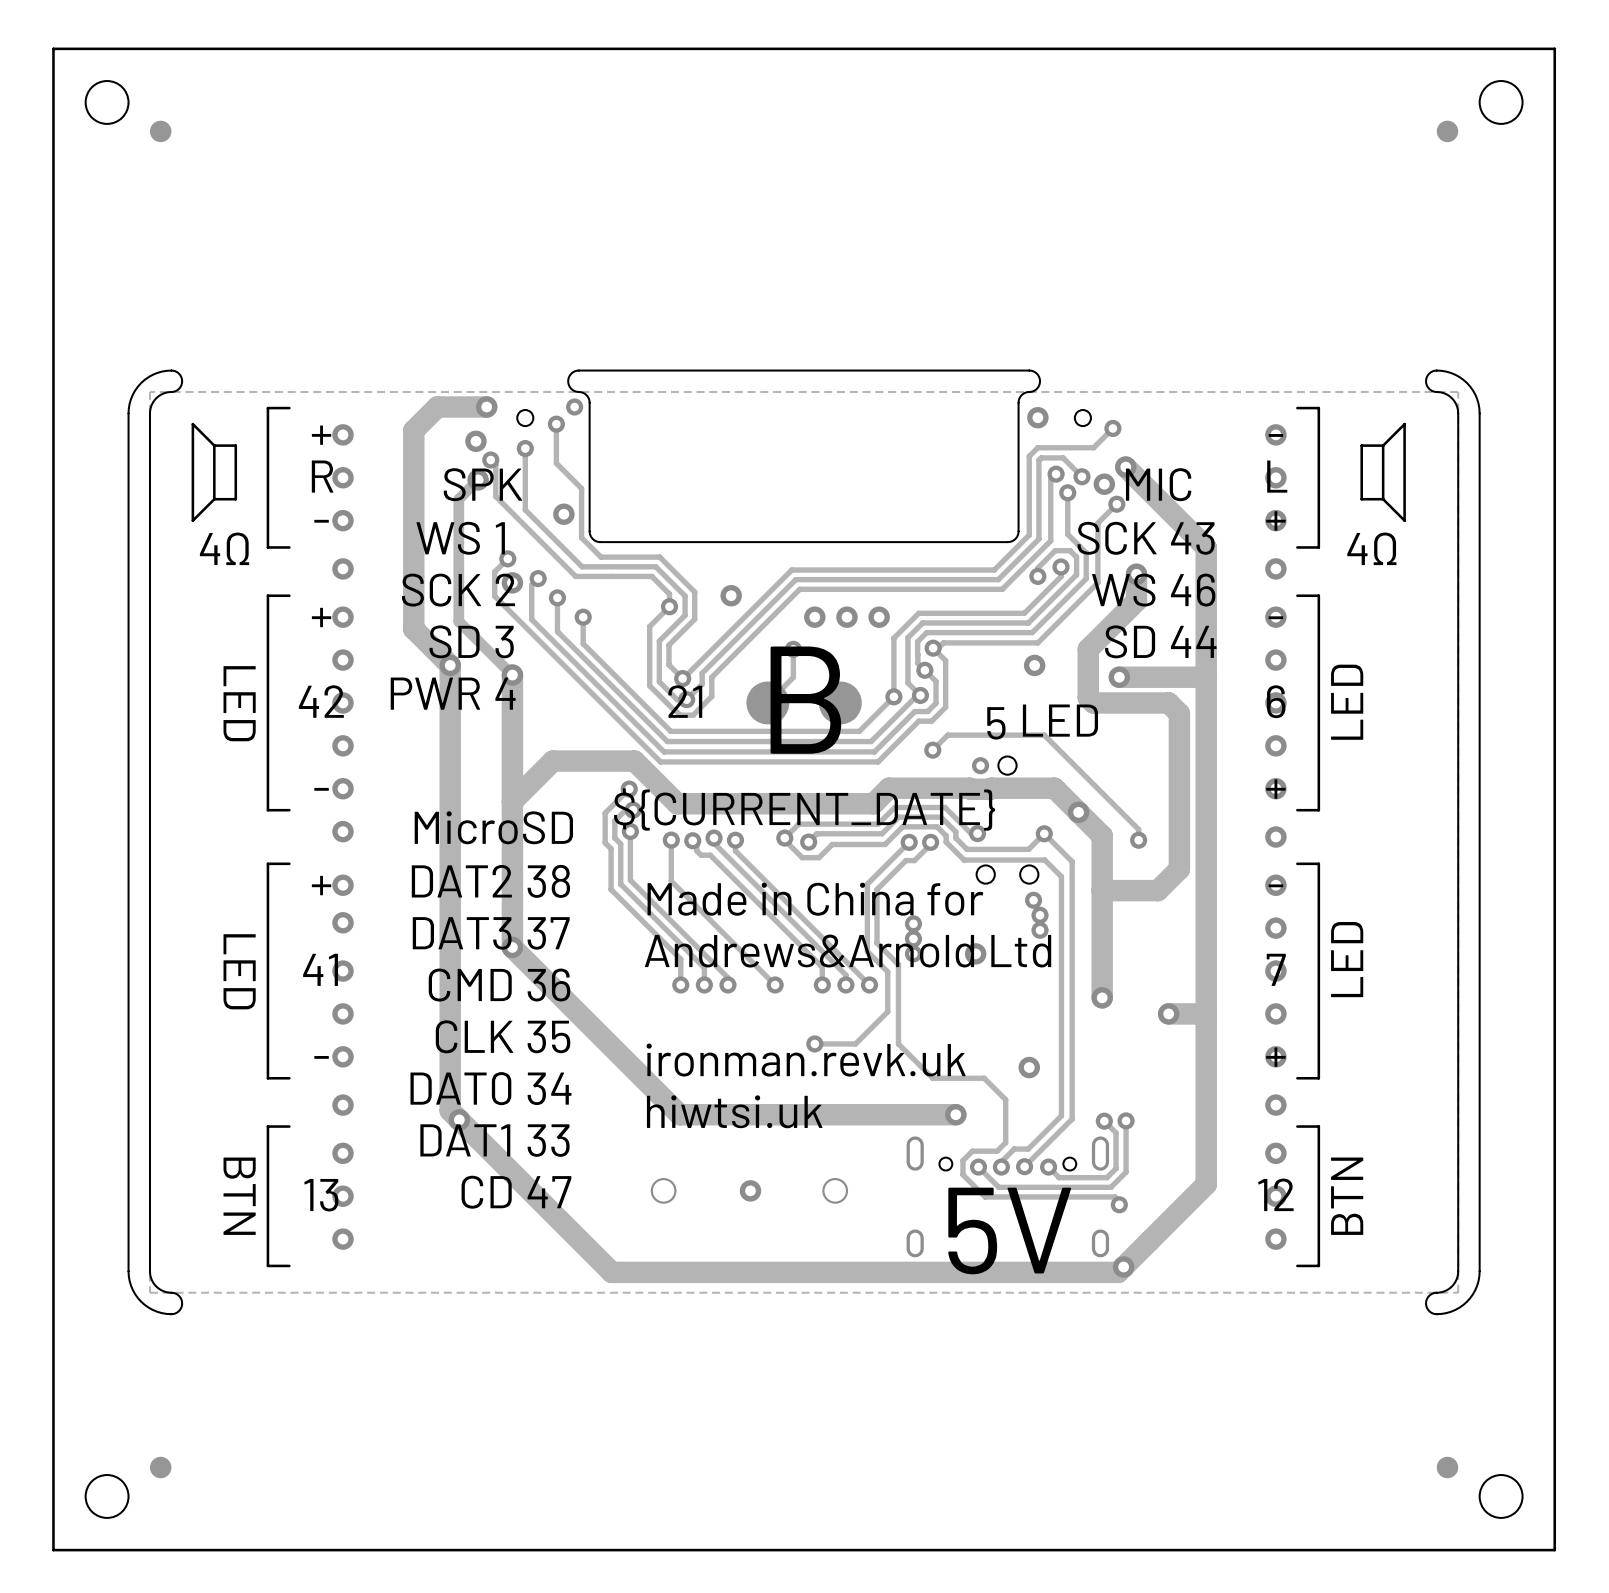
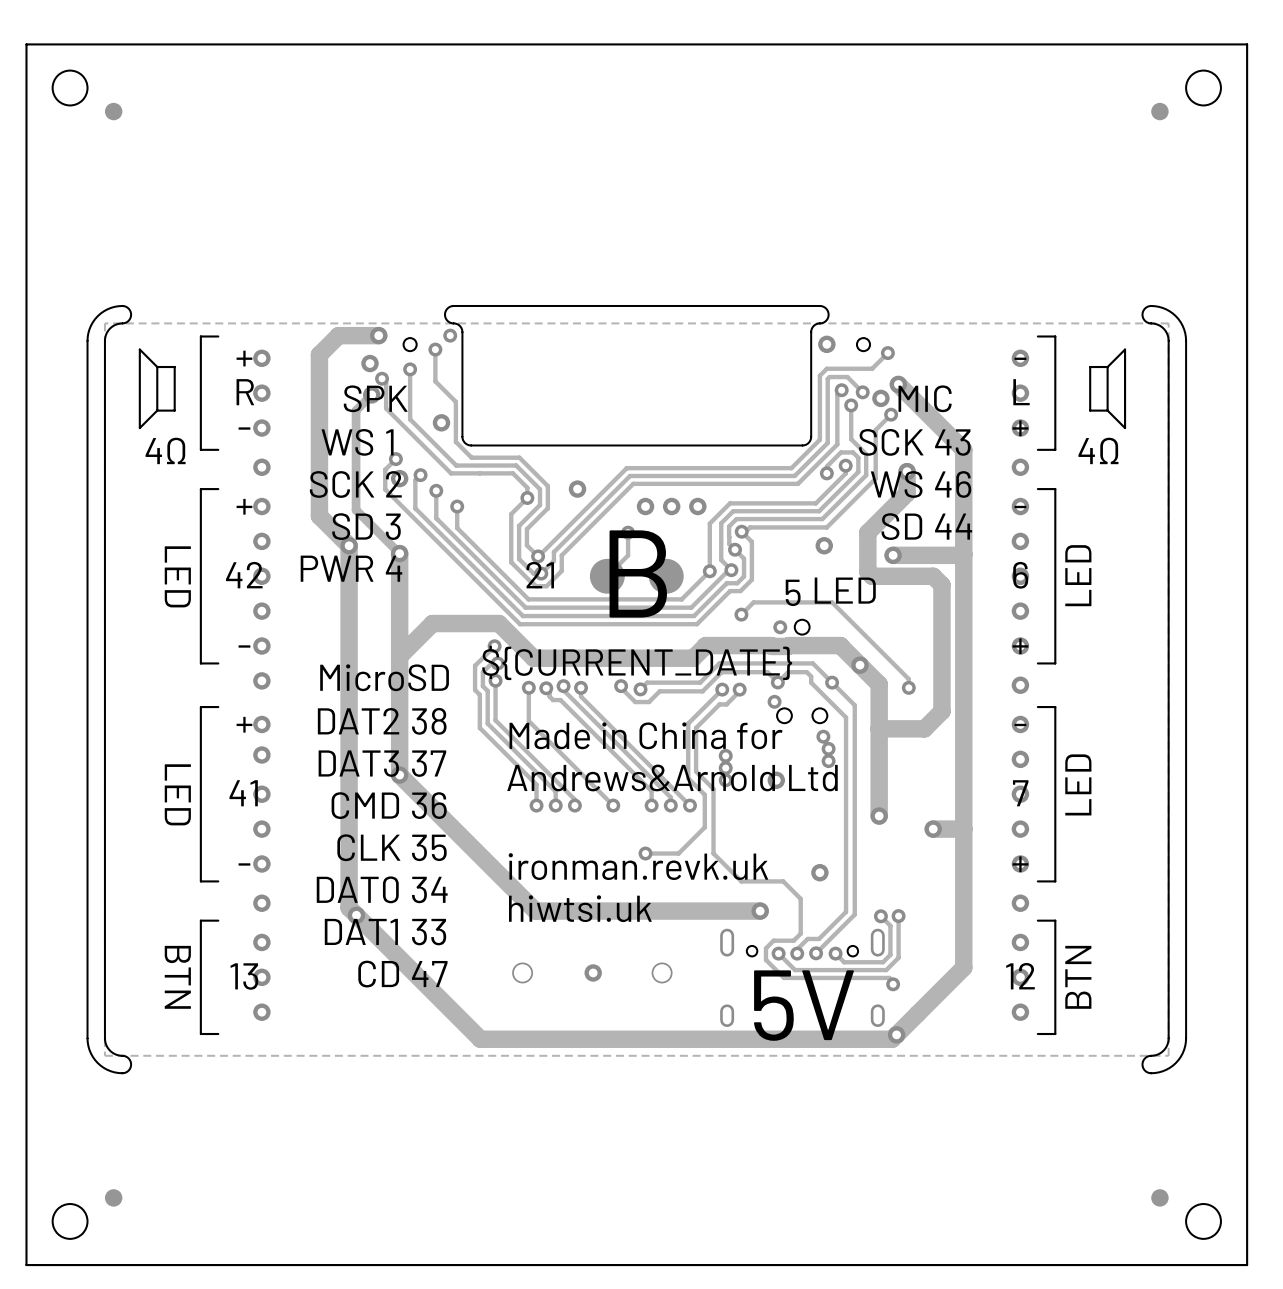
track: (898, 817) (941, 817) (955, 831) (955, 838) (967, 849) (1028, 849) (1044, 833) -> (713, 669) (719, 663) (812, 663) (832, 682)
track: (902, 826) (937, 826) (946, 835) (946, 842) (964, 860) (1044, 860) -> (717, 676) (721, 672) (767, 672) (777, 682) (788, 672) (806, 672) (811, 676) (811, 682) (832, 703)
track: (977, 833) (971, 833) (945, 807) (894, 807) (878, 824) (798, 824) (784, 838) -> none
via: none -> (774, 701)

